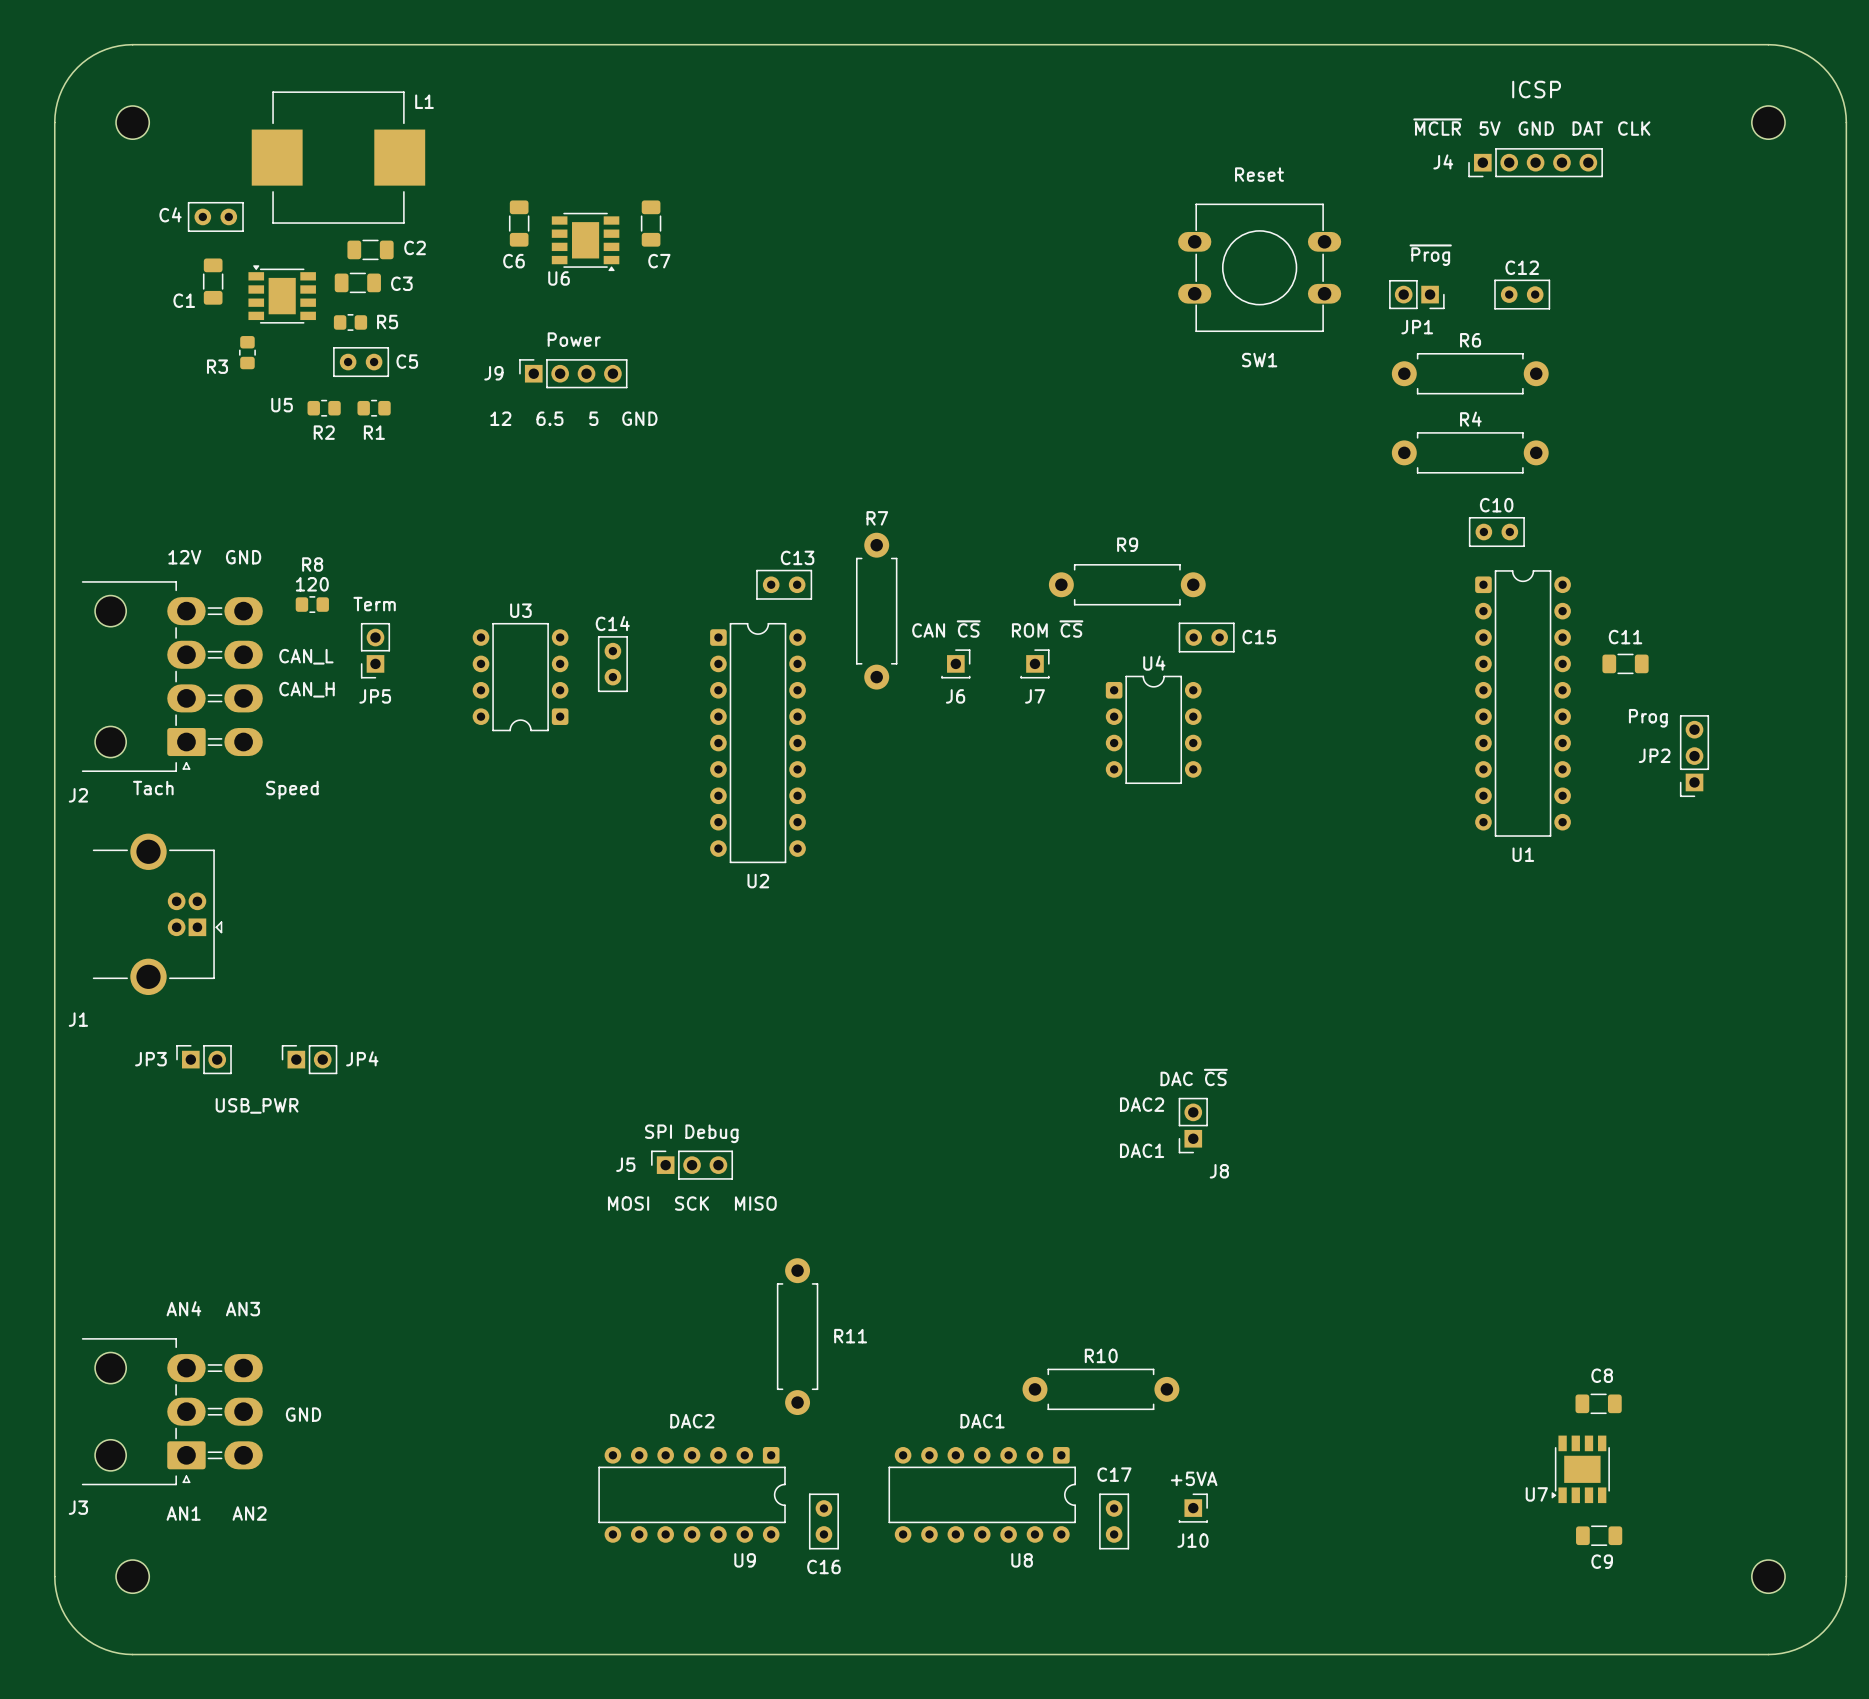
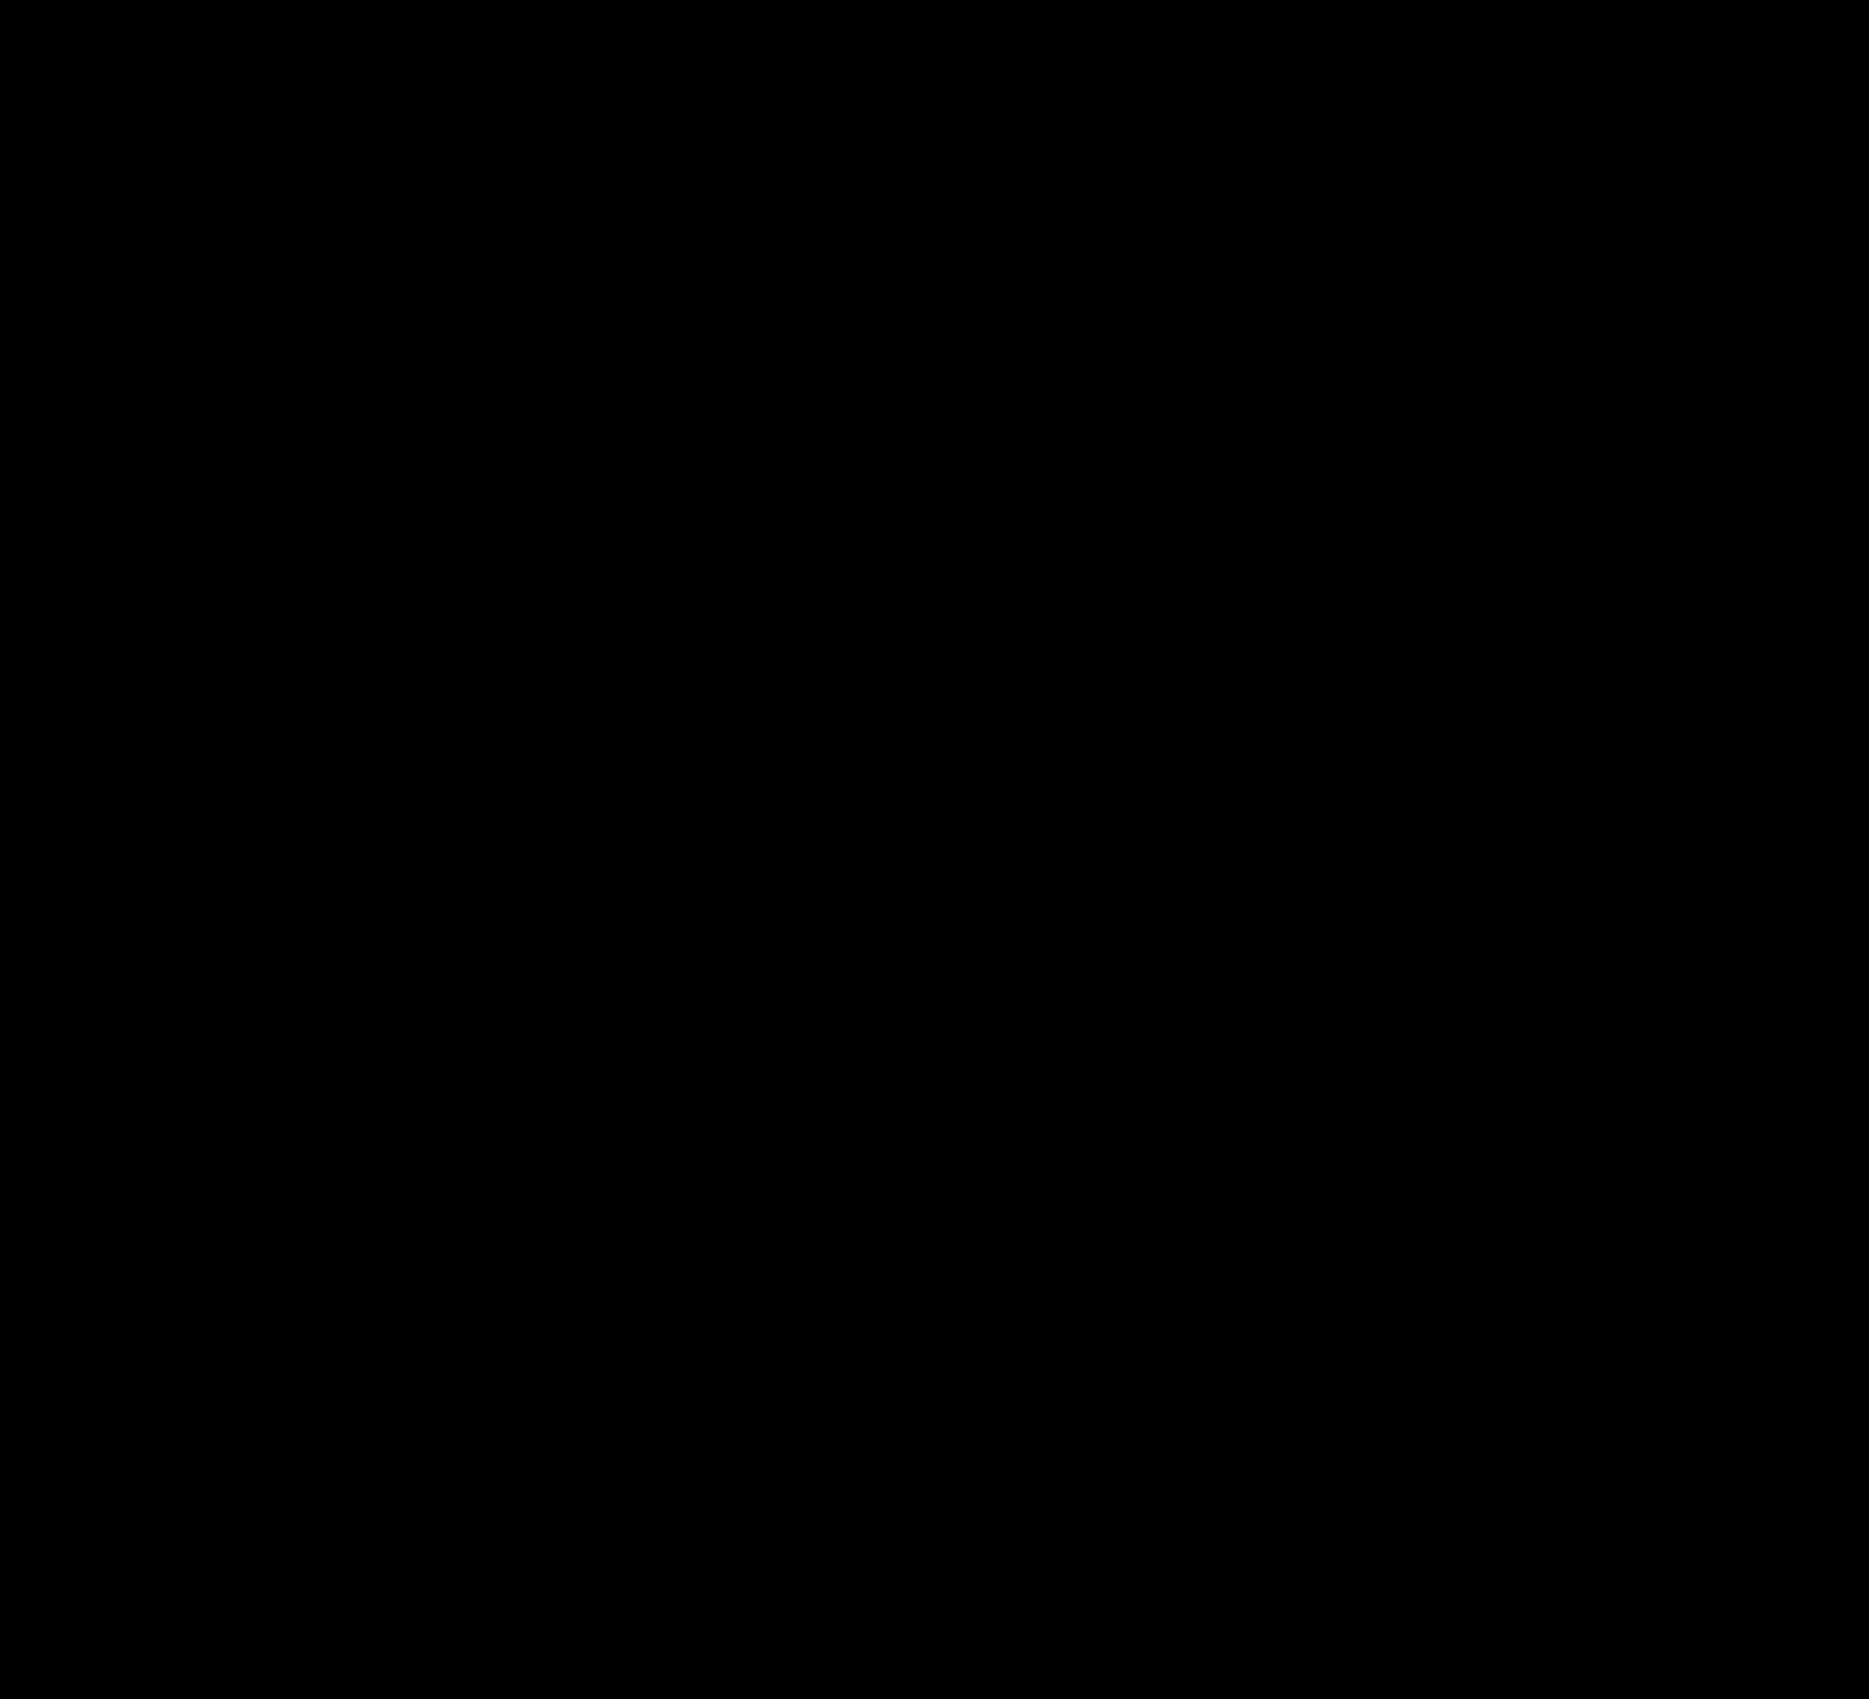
board edge: (132, 44) (1768, 44) (1788, 47) (1801, 51) (1823, 67) (1839, 89) (1843, 102) (1846, 122) (1846, 1576) (1841, 1603) (1832, 1621) (1823, 1631) (1801, 1647) (1788, 1651) (1768, 1654) (132, 1654) (106, 1649) (87, 1640) (77, 1631) (68, 1621) (59, 1603) (54, 1576) (54, 122) (57, 102) (62, 89) (77, 67) (93, 55) (106, 49) (132, 44) -> none
part: (132, 122) -> none
part: (1768, 122) -> none
text: ~{MCLR} (1437, 127) -> none
text: 5V (1490, 128) -> none
text: GND (1536, 128) -> none
text: DAT (1587, 128) -> none
text: CLK (1634, 128) -> none
L1: (338, 157) -> none
J4: ICSP (1535, 162) -> none
C4: (215, 216) -> none
C6: (519, 223) -> none
C7: (651, 223) -> none
U6: (585, 241) -> none
C2: (370, 249) -> none
SW1: Reset (1259, 267) -> none
C1: (213, 281) -> none
C3: (357, 282) -> none
U5: (282, 294) -> none
JP1: ~{Prog} (1416, 294) -> none
C12: (1522, 294) -> none
R5: (350, 322) -> none
text: Power (574, 339) -> none
R3: (247, 352) -> none
C5: (361, 362) -> none
J9: (573, 373) -> none
R6: (1470, 373) -> none
R2: (324, 408) -> none
R1: (374, 408) -> none
text: 12 (500, 418) -> none
text: 6.5 (549, 418) -> none
text: 5 (593, 418) -> none
text: GND (639, 418) -> none
R4: (1470, 452) -> none
C10: (1496, 532) -> none
text: 12V (184, 557) -> none
text: GND (243, 557) -> none
C13: (784, 584) -> none
R9: (1127, 584) -> none
R8: 120 (312, 604) -> none
R7: (876, 611) -> none
C15: (1206, 637) -> none
JP5: Term (375, 650) -> none
text: CAN_L (306, 656) -> none
J6: CAN ~{CS} (955, 663) -> none
J7: ROM ~{CS} (1034, 663) -> none
C11: (1625, 663) -> none
C14: (612, 664) -> none
J2: (172, 676) -> none
U3: (520, 677) -> none
text: CAN_H (307, 689) -> none
U1: (1523, 703) -> none
U4: (1153, 729) -> none
U2: (758, 743) -> none
JP2: Prog (1694, 756) -> none
text: Tach (153, 788) -> none
text: Speed (292, 790) -> none
J1: (157, 914) -> none
JP3: USB_PWR (204, 1059) -> none
JP4: (309, 1059) -> none
text: DAC2 (1142, 1104) -> none
J8: DAC ~{CS} (1193, 1125) -> none
text: DAC1 (1142, 1150) -> none
J5: SPI Debug (692, 1165) -> none
text: MOSI (628, 1203) -> none
text: SCK (692, 1203) -> none
text: MISO (755, 1203) -> none
text: AN4 (183, 1308) -> none
text: AN3 (242, 1309) -> none
R11: (797, 1336) -> none
R10: (1100, 1389) -> none
C8: (1598, 1403) -> none
J3: (172, 1411) -> none
text: GND (303, 1414) -> none
text: DAC2 (692, 1421) -> none
text: DAC1 (982, 1421) -> none
U7: (1580, 1469) -> none
U9: (692, 1494) -> none
U8: (982, 1494) -> none
J10: +5VA (1193, 1508) -> none
text: AN1 (183, 1513) -> none
text: AN2 (249, 1513) -> none
C16: (823, 1521) -> none
C17: (1114, 1521) -> none
C9: (1599, 1535) -> none
part: (132, 1576) -> none
part: (1768, 1576) -> none

